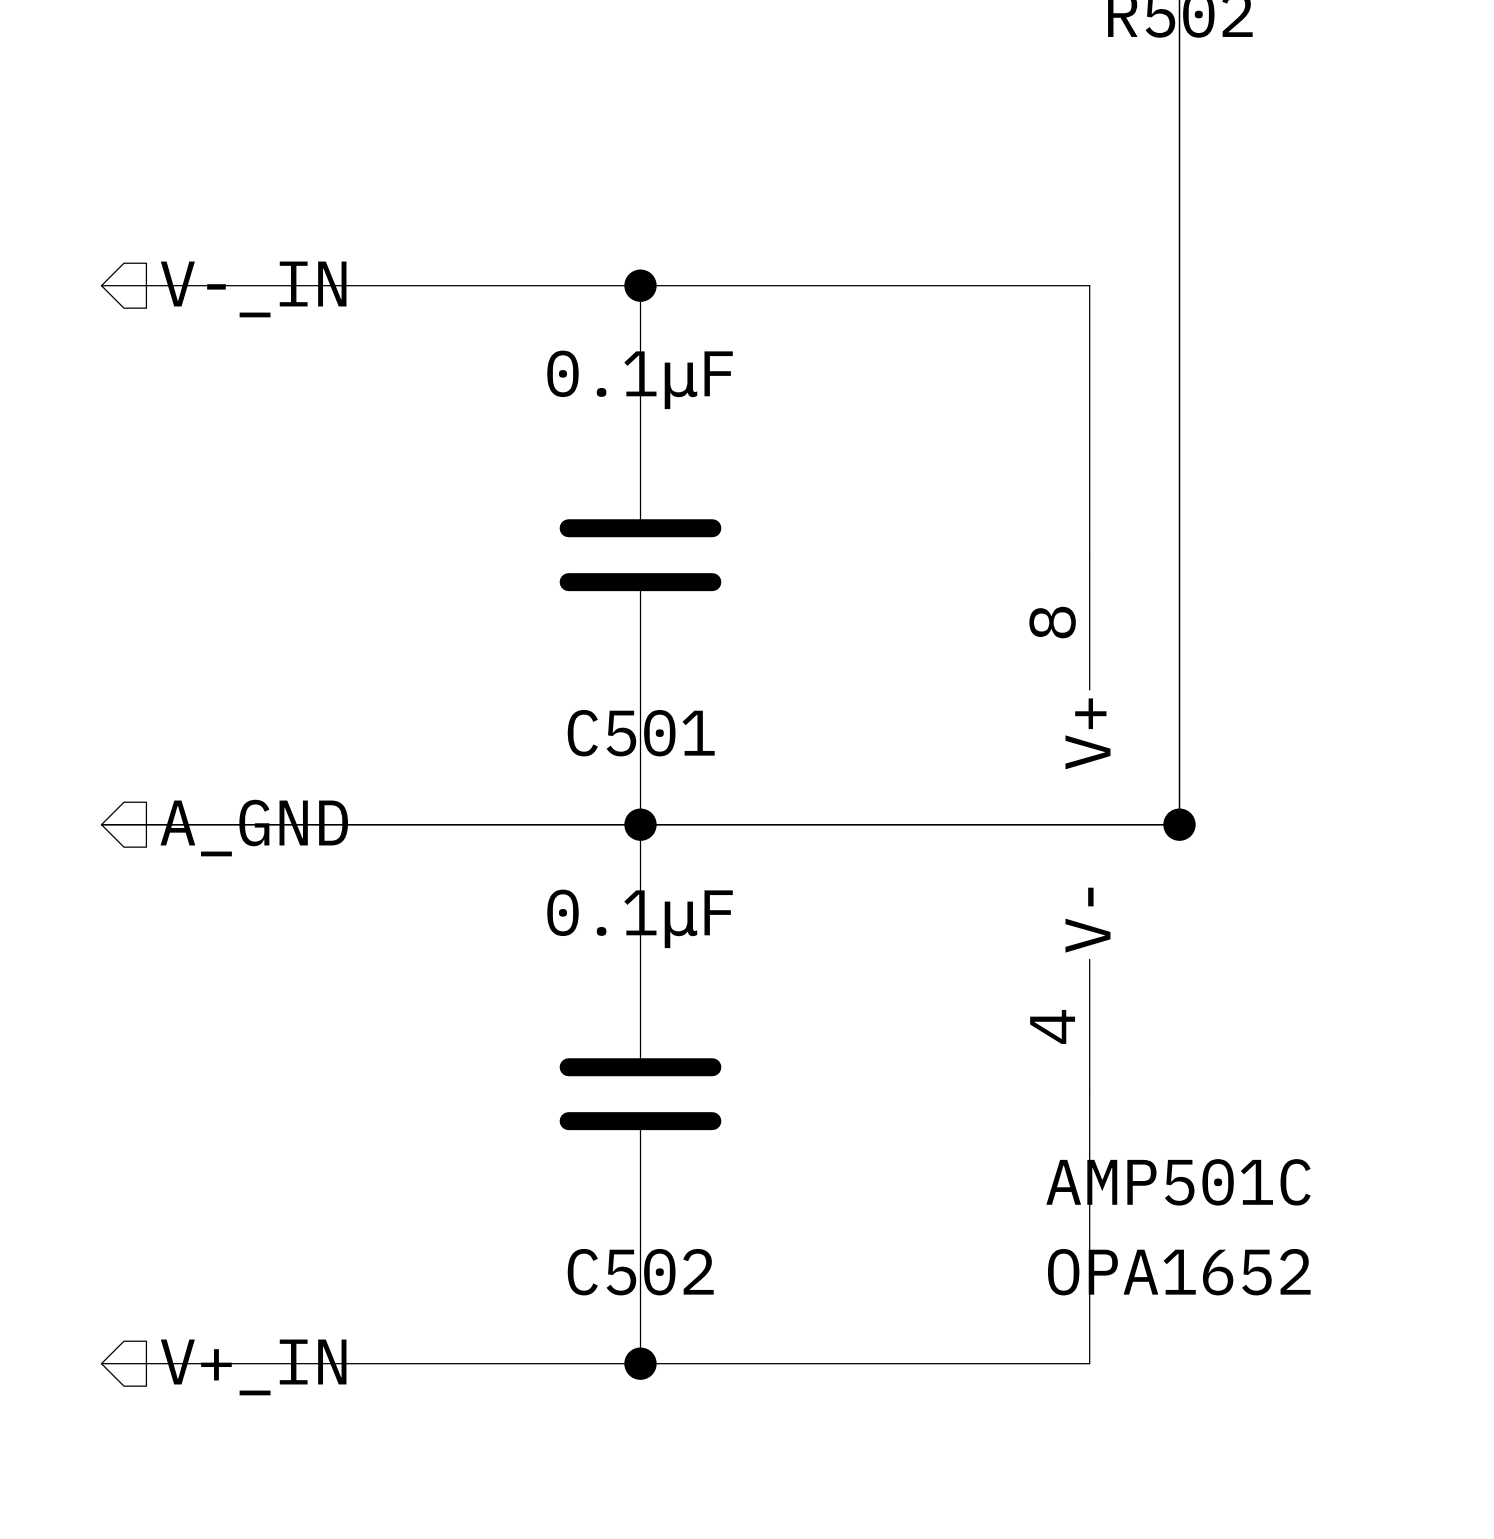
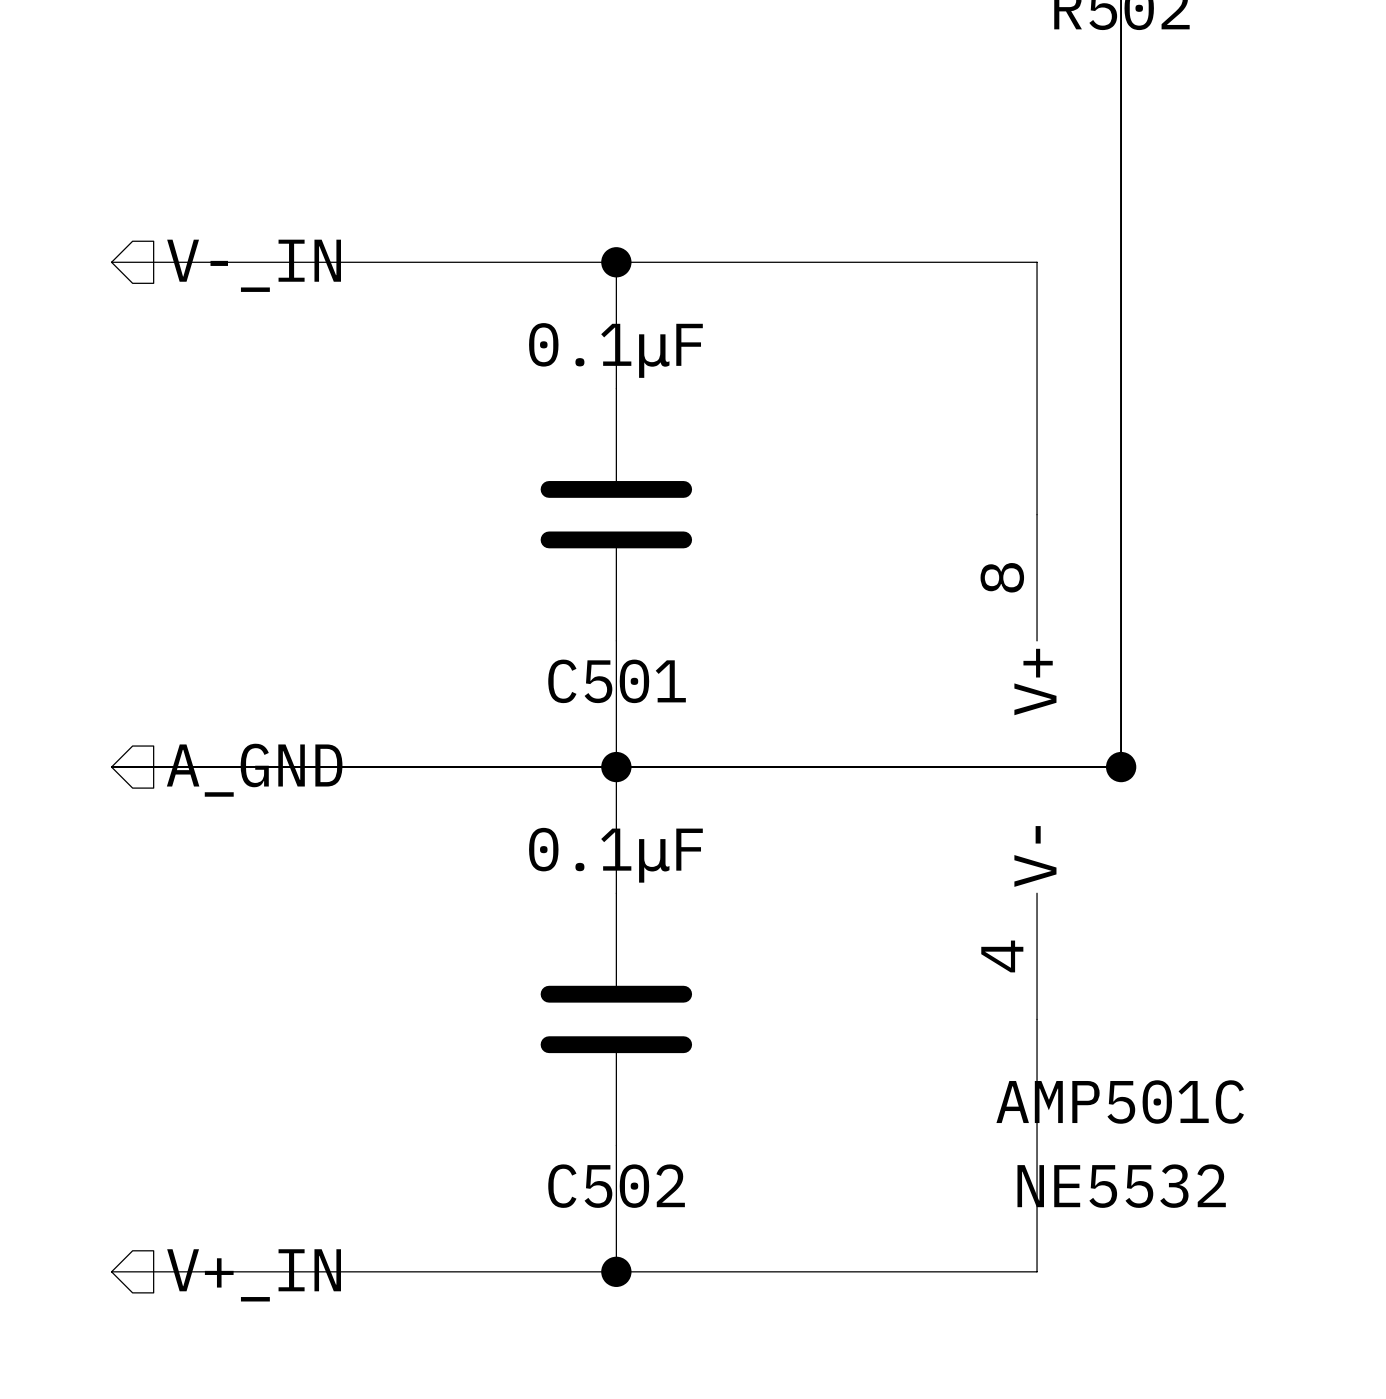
AMP501C value: OPA1652 (1179, 1272) -> NE5532 (1121, 1186)

